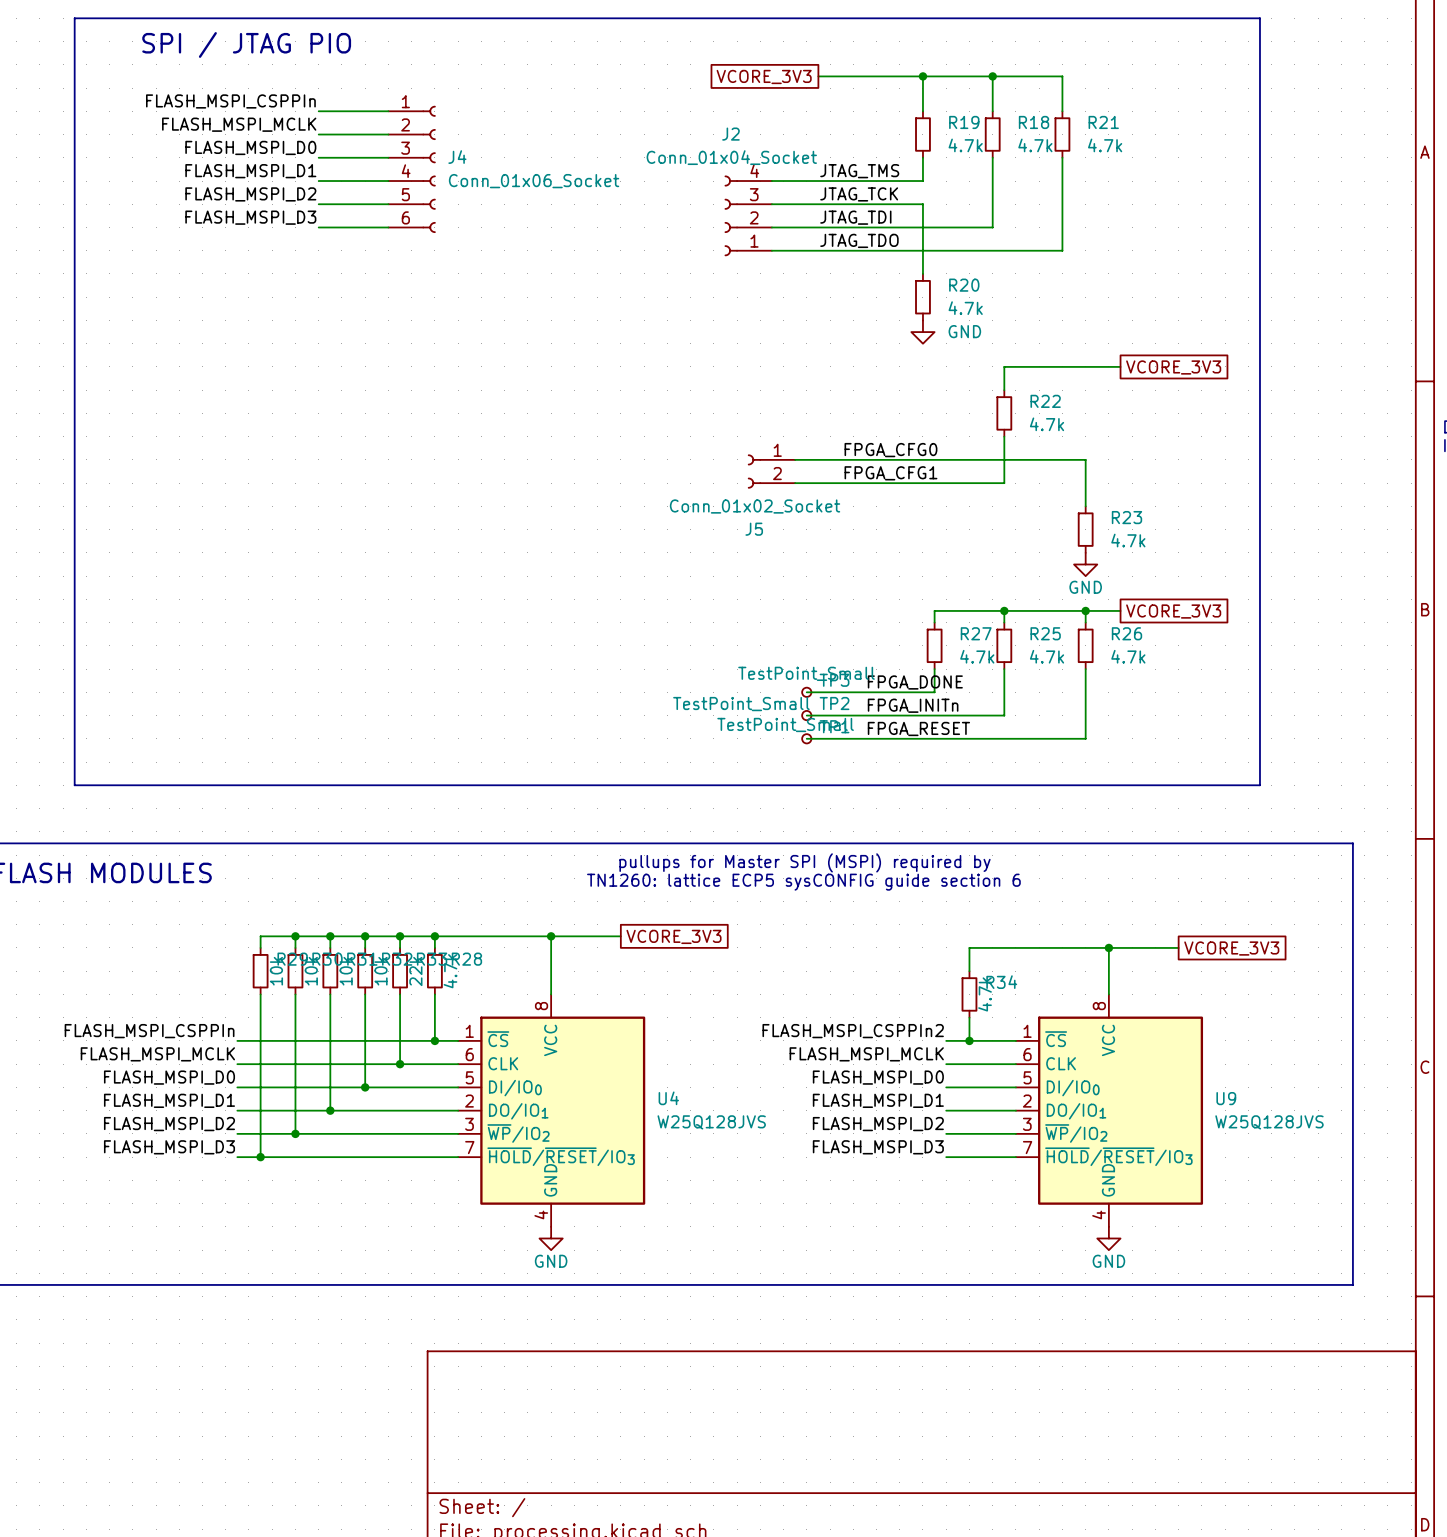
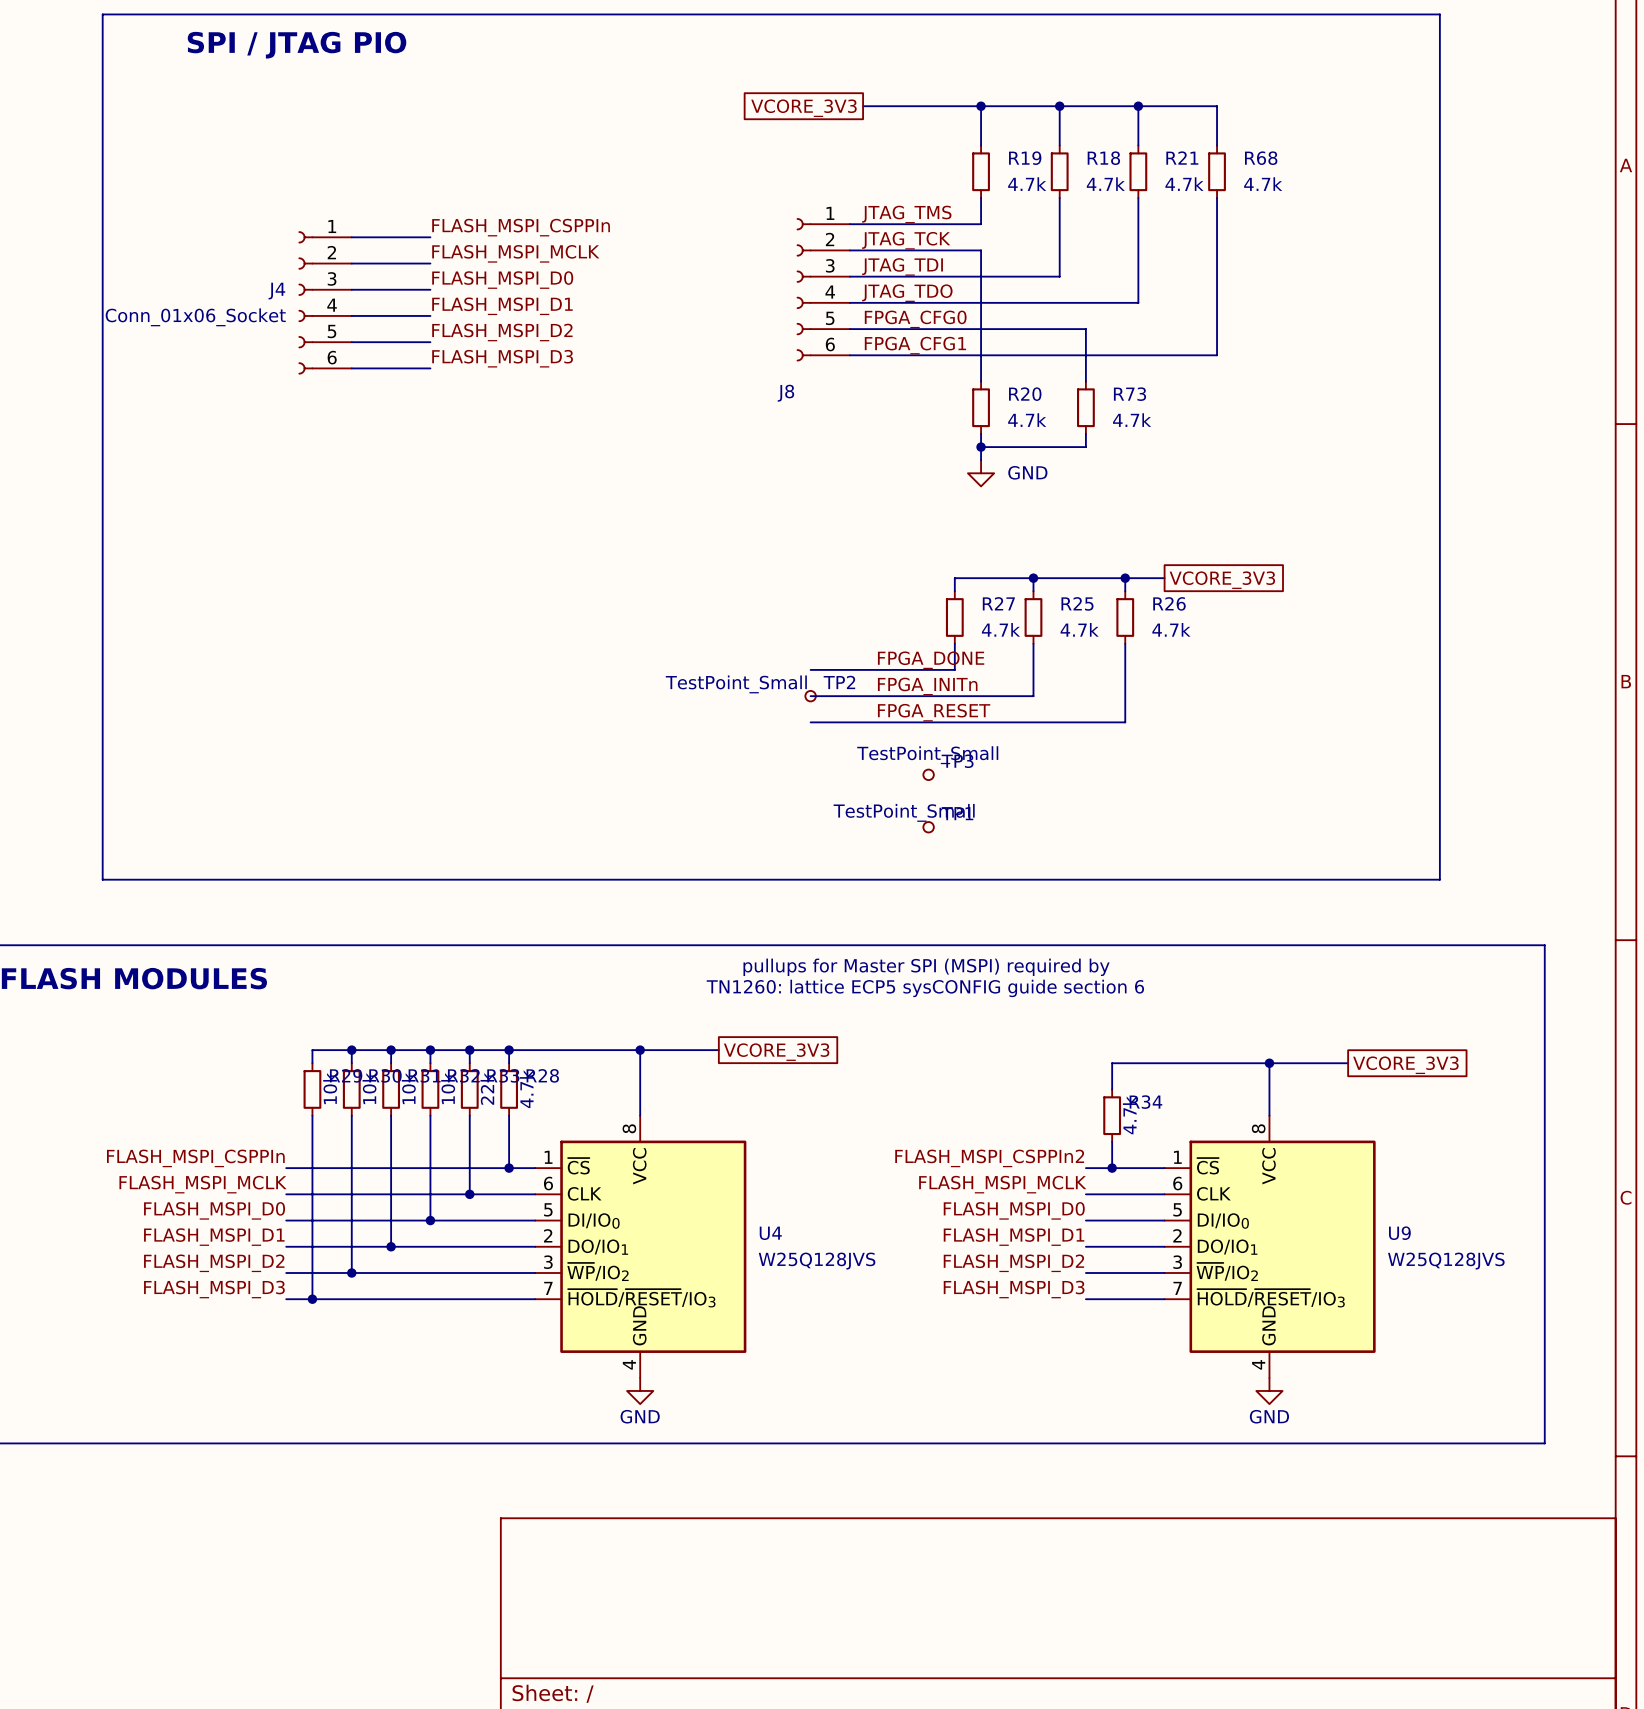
global label position: VCORE_3V3 (764, 76) -> VCORE_3V3 (803, 108)
wire: (818, 76) (1062, 76) (1062, 99) -> (863, 106) (1217, 106)
wire: (922, 76) (922, 99) -> (1059, 119) (1059, 145)
junction position: (922, 76) -> (1059, 106)
wire: (992, 76) (992, 99) -> (1138, 119) (1138, 145)
junction position: (992, 76) -> (1138, 106)
wire: none -> (981, 106) (981, 145)
junction: none -> (981, 106)
label position: FLASH_MSPI_CSPPIn (230, 101) -> FLASH_MSPI_CSPPIn (521, 227)
wire: (318, 111) (388, 111) -> (351, 237) (430, 237)
label position: FLASH_MSPI_MCLK (239, 124) -> FLASH_MSPI_MCLK (515, 253)
wire: (318, 134) (388, 134) -> (351, 263) (430, 263)
R19 position: (922, 134) -> (981, 171)
R18 position: (992, 134) -> (1059, 171)
R21 position: (1062, 134) -> (1138, 171)
label position: FLASH_MSPI_D0 (250, 147) -> FLASH_MSPI_D0 (502, 280)
wire: (318, 157) (388, 157) -> (351, 289) (430, 289)
wire: (922, 157) (922, 181) (771, 181) -> none
wire: (992, 157) (992, 181) -> (1059, 197) (1059, 224)
wire: (1062, 157) (1062, 181) -> (1217, 119) (1217, 145)
R68: none -> 4.7k (1217, 171)
J4 position: (412, 169) -> (325, 302)
J4 flip: as is (429, 169) -> left-right (305, 302)
label position: FLASH_MSPI_D1 (250, 171) -> FLASH_MSPI_D1 (502, 306)
label position: JTAG_TMS (859, 171) -> JTAG_TMS (906, 214)
wire: (318, 181) (388, 181) -> (351, 315) (430, 315)
label position: FLASH_MSPI_D2 (250, 194) -> FLASH_MSPI_D2 (502, 332)
label position: JTAG_TCK (859, 194) -> JTAG_TCK (906, 240)
wire: (318, 204) (388, 204) -> (351, 342) (430, 342)
wire: (853, 204) (922, 204) -> (981, 224) (981, 197)
J2: Conn_01x04_Socket (748, 215) -> none
label position: FLASH_MSPI_D3 (250, 217) -> FLASH_MSPI_D3 (502, 358)
label position: JTAG_TDI (855, 217) -> JTAG_TDI (902, 266)
wire: (318, 227) (388, 227) -> (351, 368) (430, 368)
wire: (853, 227) (992, 227) -> (849, 302) (1138, 302) (1138, 250)
wire: none -> (981, 250) (981, 381)
label position: JTAG_TDO (859, 240) -> JTAG_TDO (907, 293)
wire: (1062, 250) (922, 250) (922, 273) -> (1217, 276) (1217, 355) (849, 355)
J8: none -> (823, 289)
wire: none -> (849, 329) (1085, 329) (1085, 381)
R20 position: (922, 297) -> (981, 407)
power symbol position: GND (922, 332) -> GND (981, 473)
R73: none -> 4.7k (1085, 407)
wire: (1120, 366) (1004, 366) (1004, 390) -> none
global label: VCORE_3V3 (1173, 367) -> none
wire: none -> (981, 433) (981, 460)
wire: none -> (1085, 433) (1085, 447) (981, 447)
junction: none -> (981, 447)
R22: 4.7k (1004, 413) -> none
wire: (1004, 436) (1004, 483) (795, 483) -> none
label position: FPGA_CFG0 (890, 450) -> FPGA_CFG0 (915, 319)
wire: (795, 459) (1085, 459) (1085, 506) -> none
J5: Conn_01x02_Socket (771, 471) -> none
label position: FPGA_CFG1 (890, 473) -> FPGA_CFG1 (915, 345)
junction: none -> (1033, 578)
junction: none -> (1125, 578)
global label: none -> VCORE_3V3 (1222, 580)
R23: 4.7k (1085, 529) -> none
power symbol: GND (1085, 564) -> none
wire: (1004, 610) (1004, 622) -> (1033, 578) (1033, 591)
junction: (1004, 610) -> none
wire: (1085, 610) (1085, 622) -> (1125, 578) (1125, 591)
junction: (1085, 610) -> none
wire: (1120, 610) (934, 610) (934, 622) -> (1164, 578) (954, 578) (954, 591)
global label: VCORE_3V3 (1173, 611) -> none
R27 position: (934, 645) -> (954, 617)
R25 position: (1004, 645) -> (1033, 617)
R26 position: (1085, 645) -> (1125, 617)
wire: (934, 669) (934, 692) (806, 692) -> (954, 643) (954, 669) (810, 669)
wire: (1004, 669) (1004, 715) (806, 715) -> (1033, 643) (1033, 696) (810, 696)
wire: (1085, 669) (1085, 738) (806, 738) -> (1125, 643) (1125, 722) (810, 722)
label position: FPGA_DONE (915, 682) -> FPGA_DONE (931, 660)
label position: FPGA_INITn (913, 705) -> FPGA_INITn (927, 686)
TP2 position: (806, 715) -> (810, 696)
label position: FPGA_RESET (918, 728) -> FPGA_RESET (934, 712)

